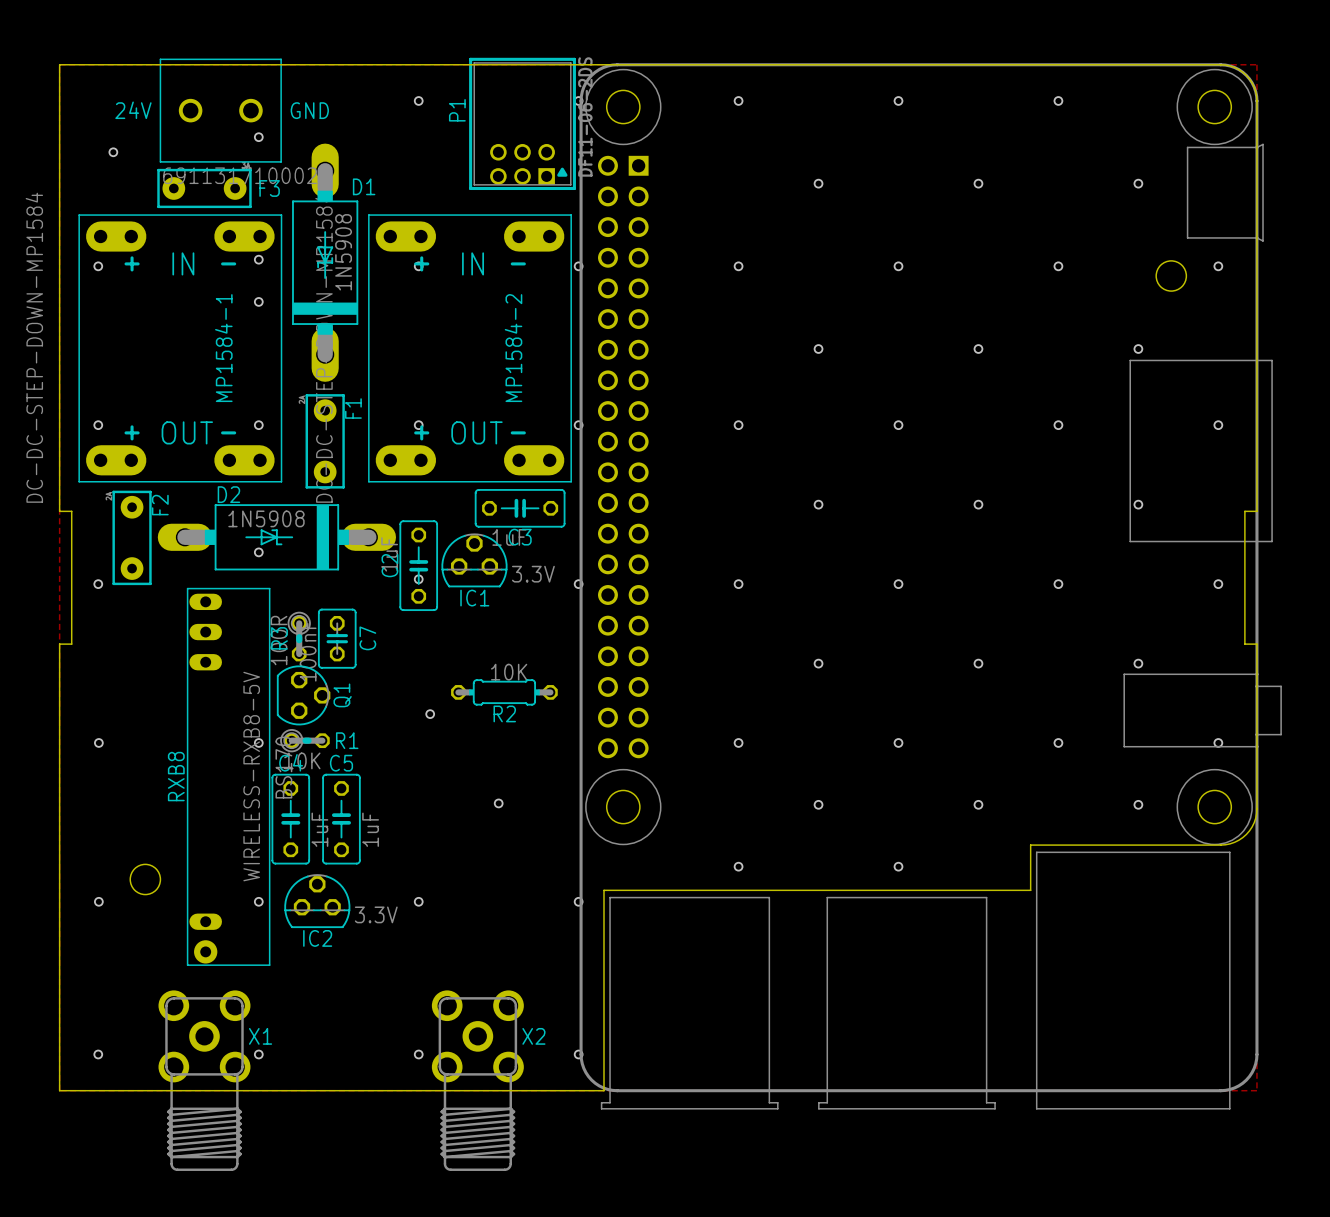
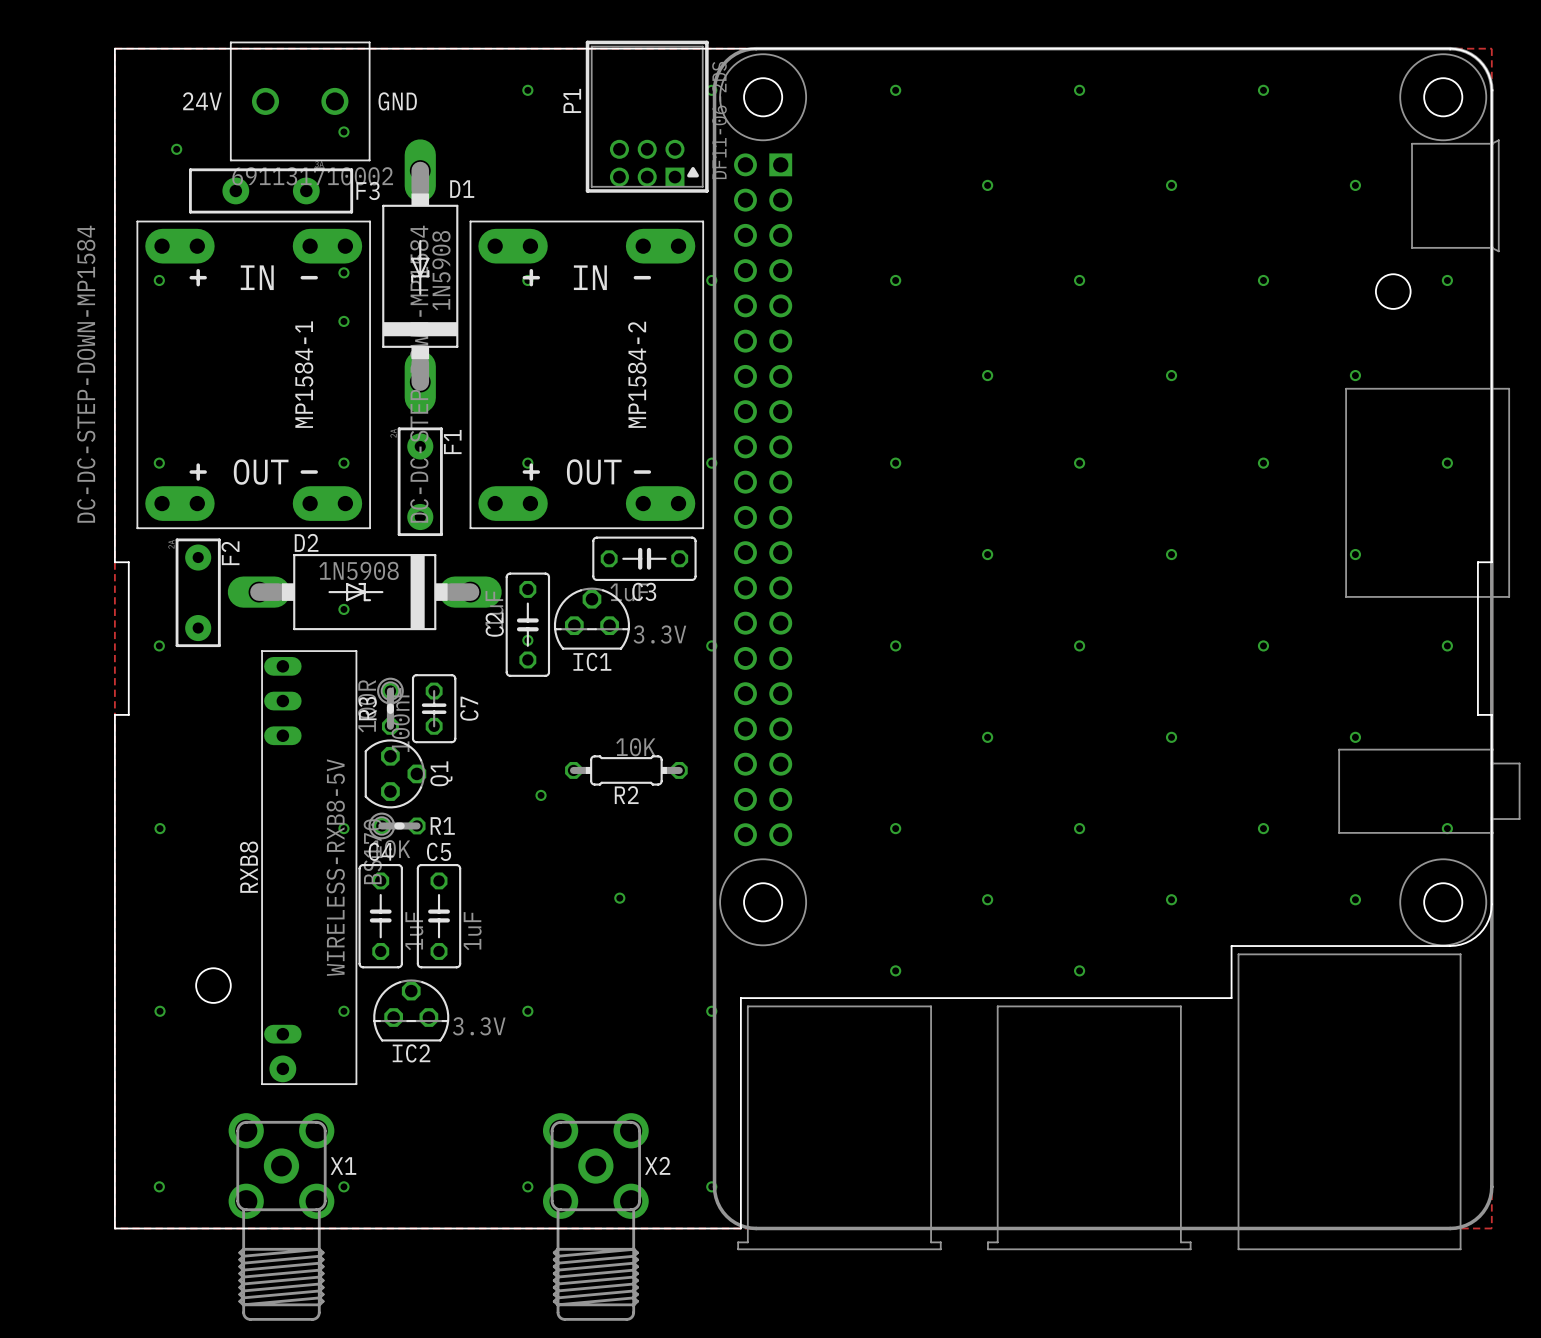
F3 footprint: [157, 168, 252, 209] -> [189, 168, 354, 214]

